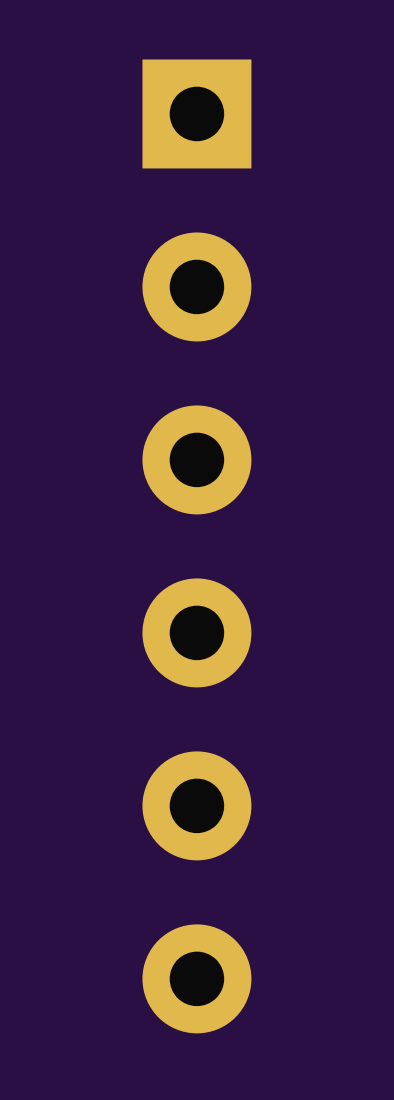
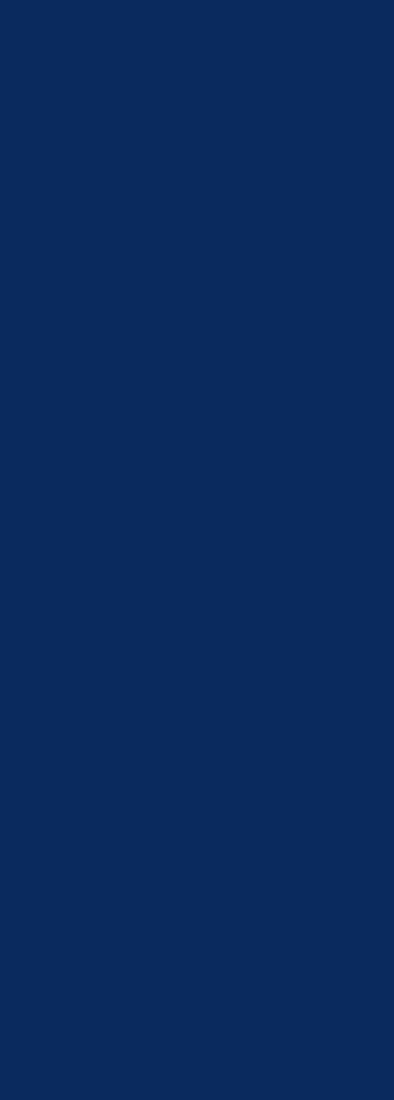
part: (196, 546) -> none

